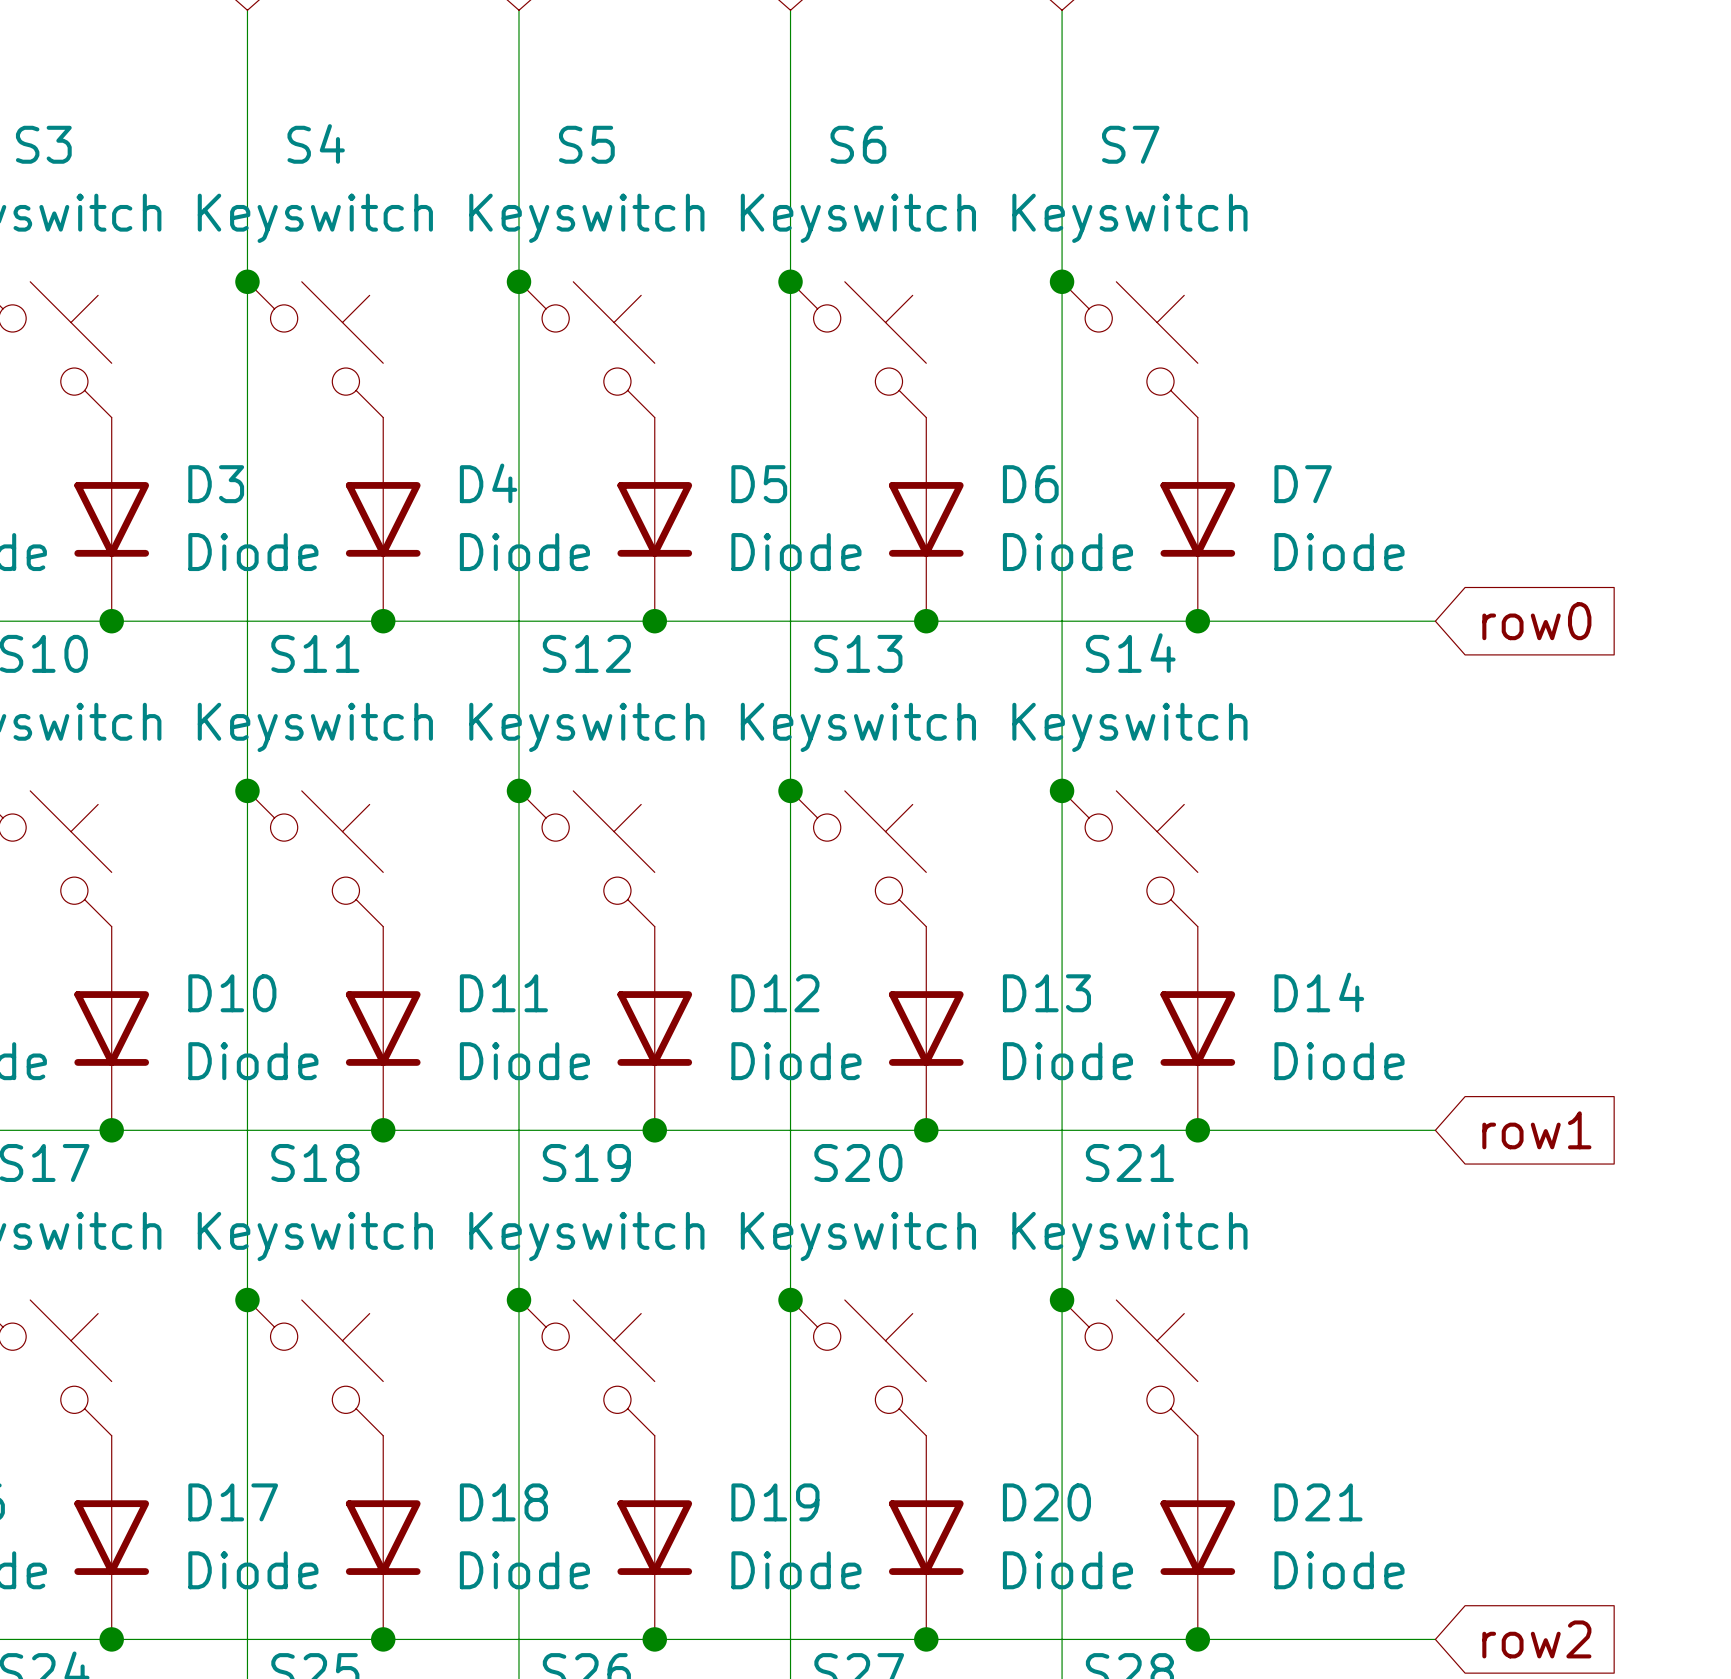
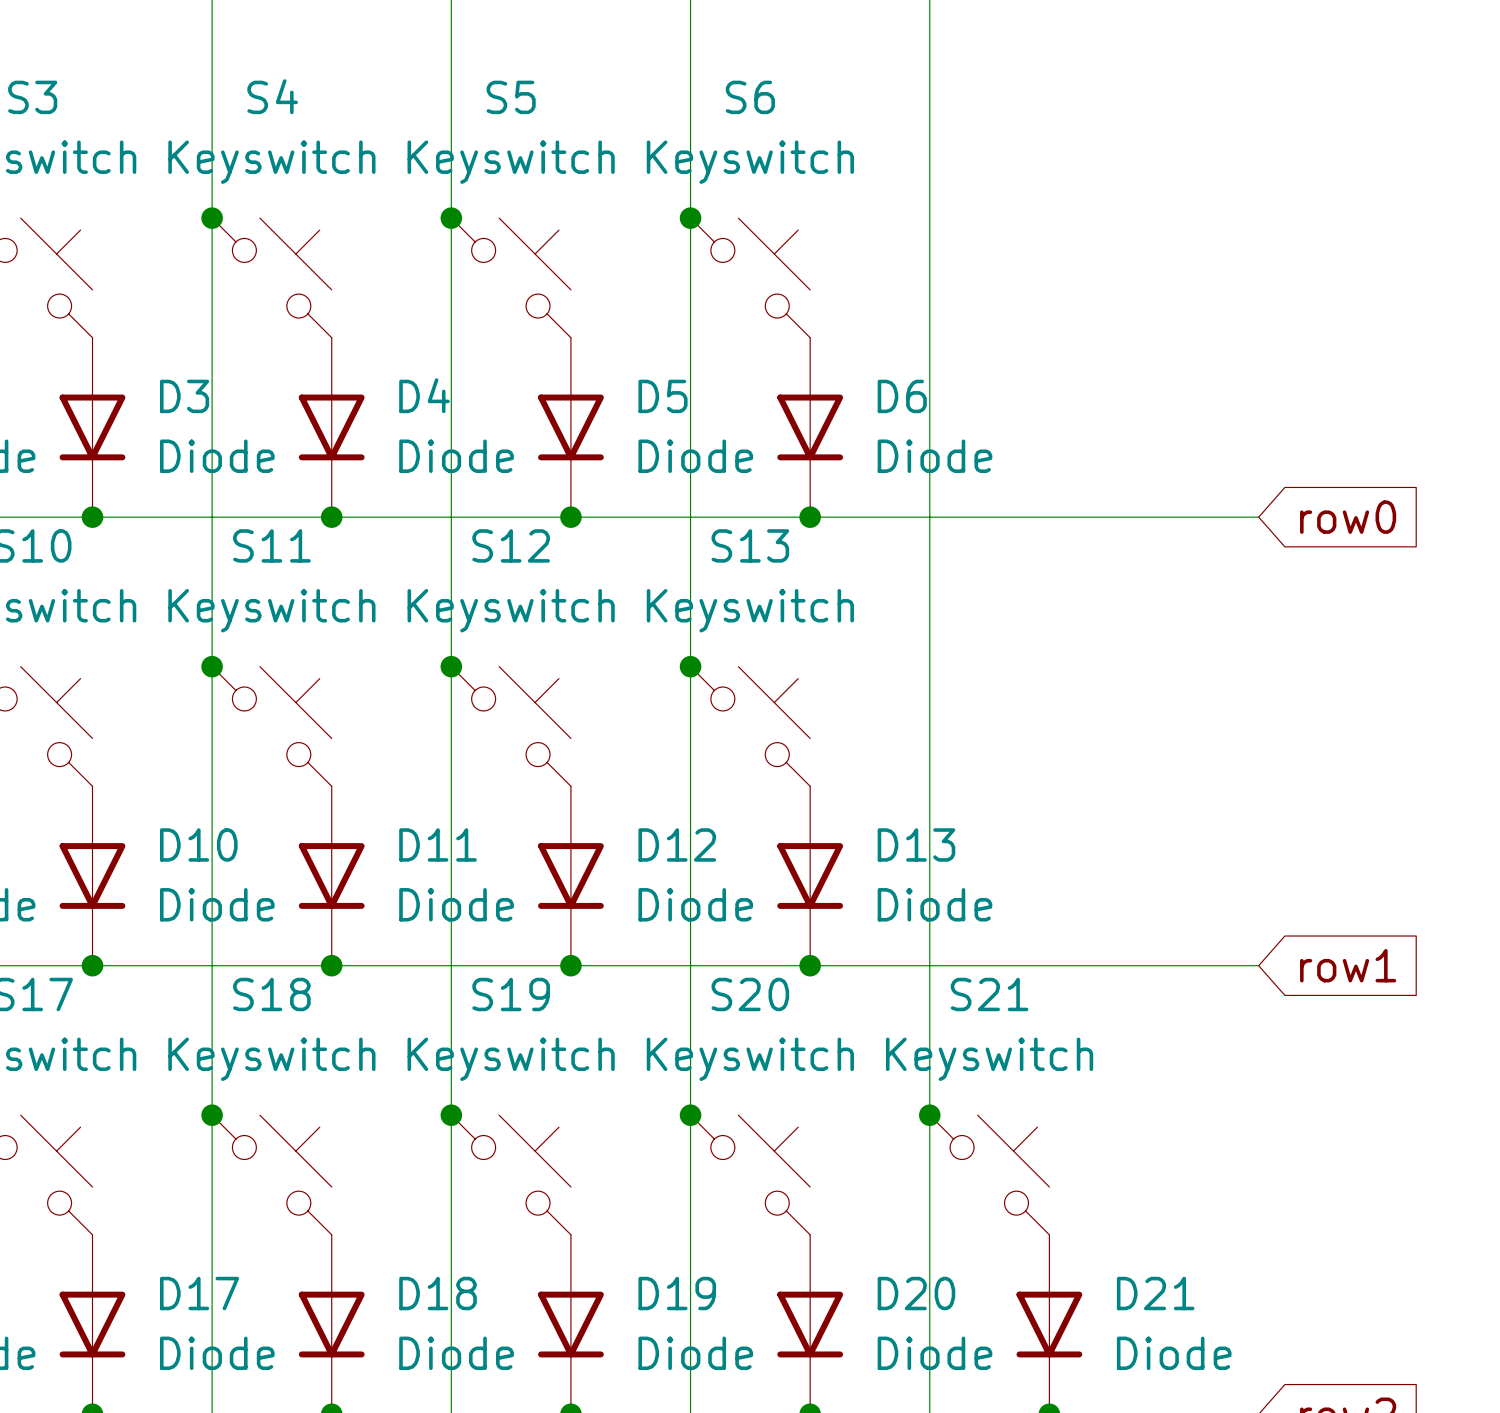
junction: (1062, 281) -> none
S7: Keyswitch (1129, 349) -> none
D7: Diode (1197, 519) -> none
junction: (1197, 621) -> none
junction: (1062, 790) -> none
S14: Keyswitch (1129, 858) -> none
D14: Diode (1197, 1028) -> none
junction: (1197, 1130) -> none

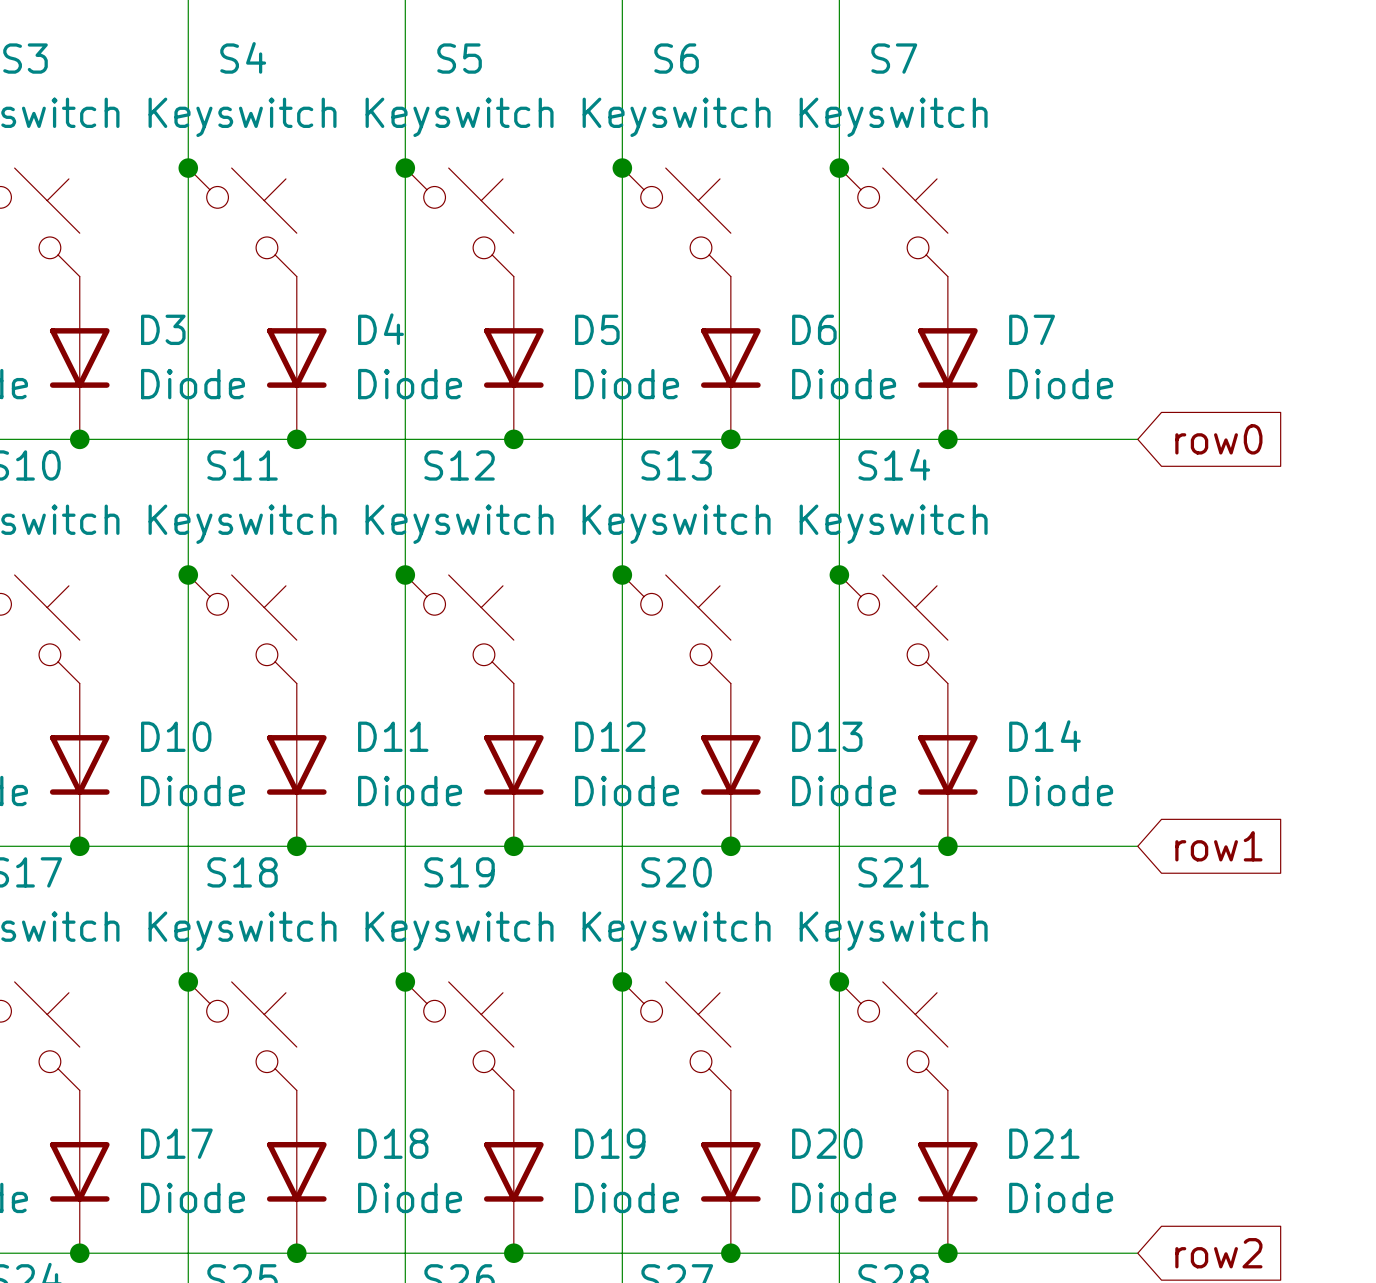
junction: none -> (839, 168)
S7: none -> Keyswitch (893, 222)
D7: none -> Diode (947, 357)
junction: none -> (947, 439)
junction: none -> (839, 575)
S14: none -> Keyswitch (893, 629)
D14: none -> Diode (947, 764)
junction: none -> (947, 846)

